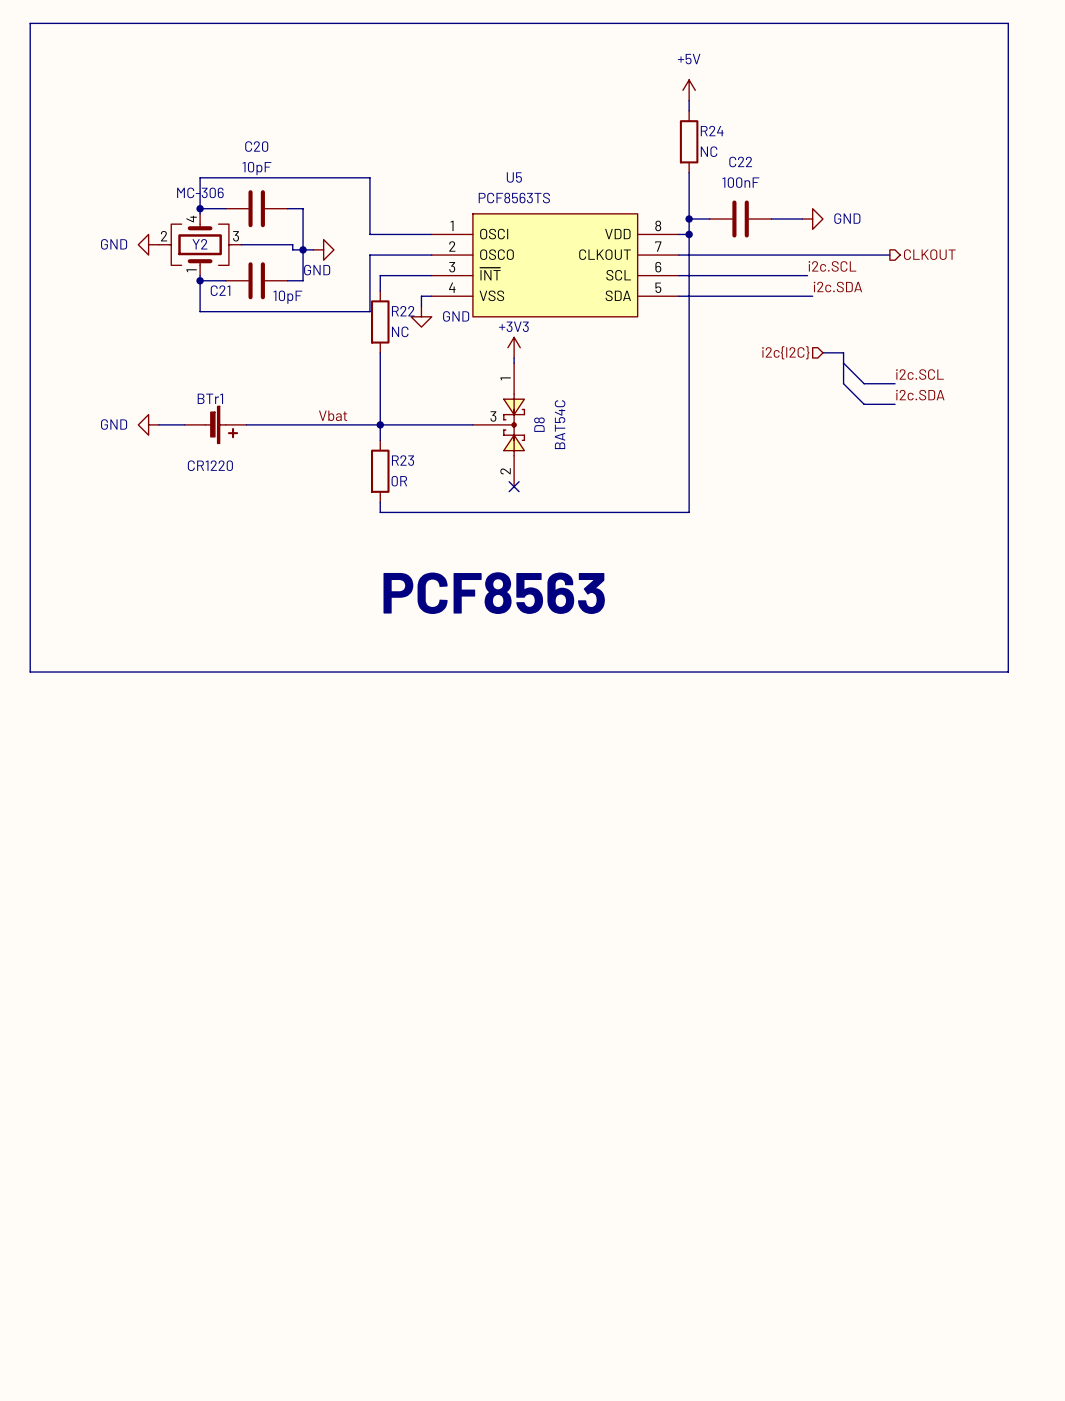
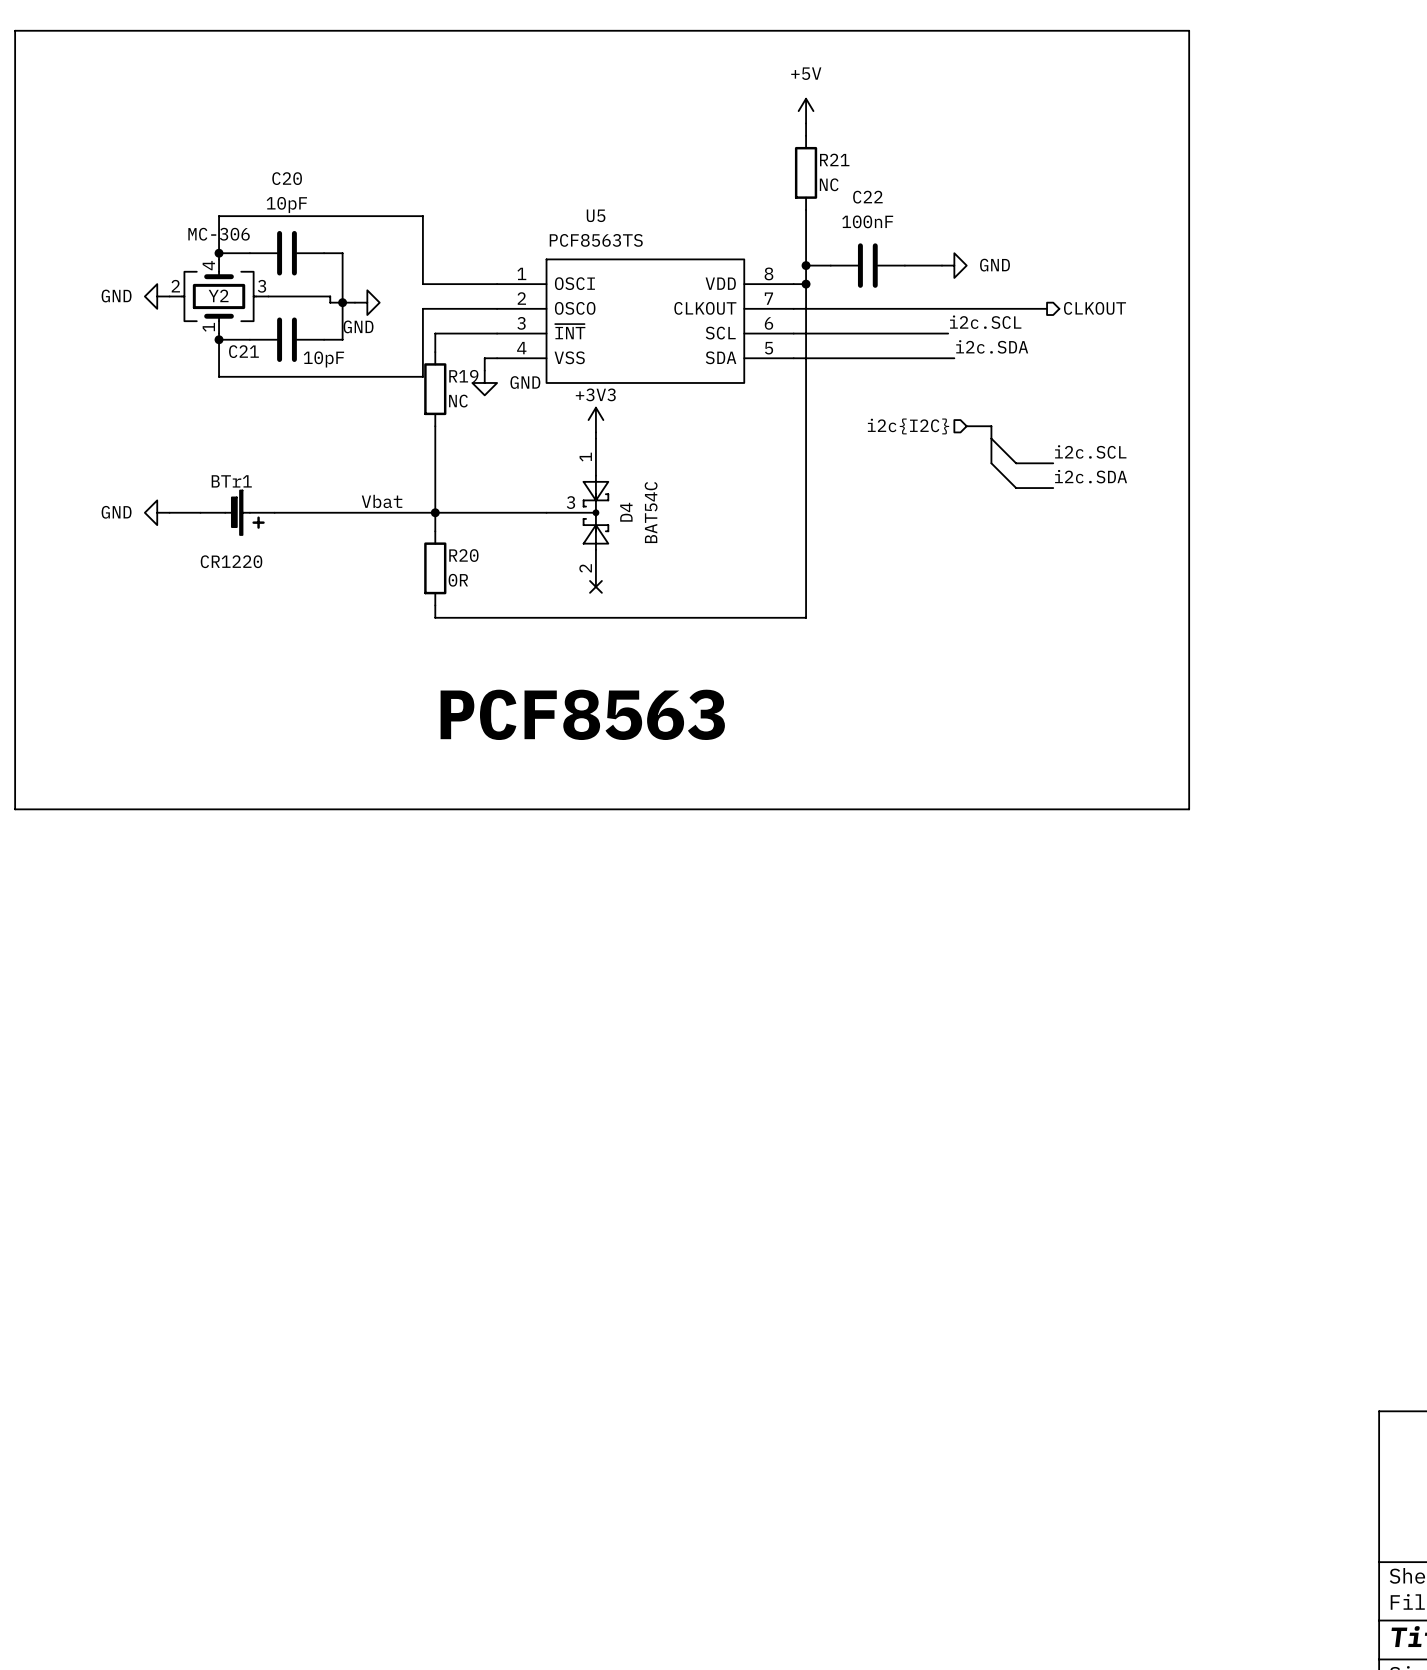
R24 name: R24 (712, 131) -> R21 (834, 159)
R22 name: R22 (403, 311) -> R19 (463, 376)
D8 name: D8 (539, 424) -> D4 (626, 512)
R23 name: R23 (403, 460) -> R20 (463, 555)

